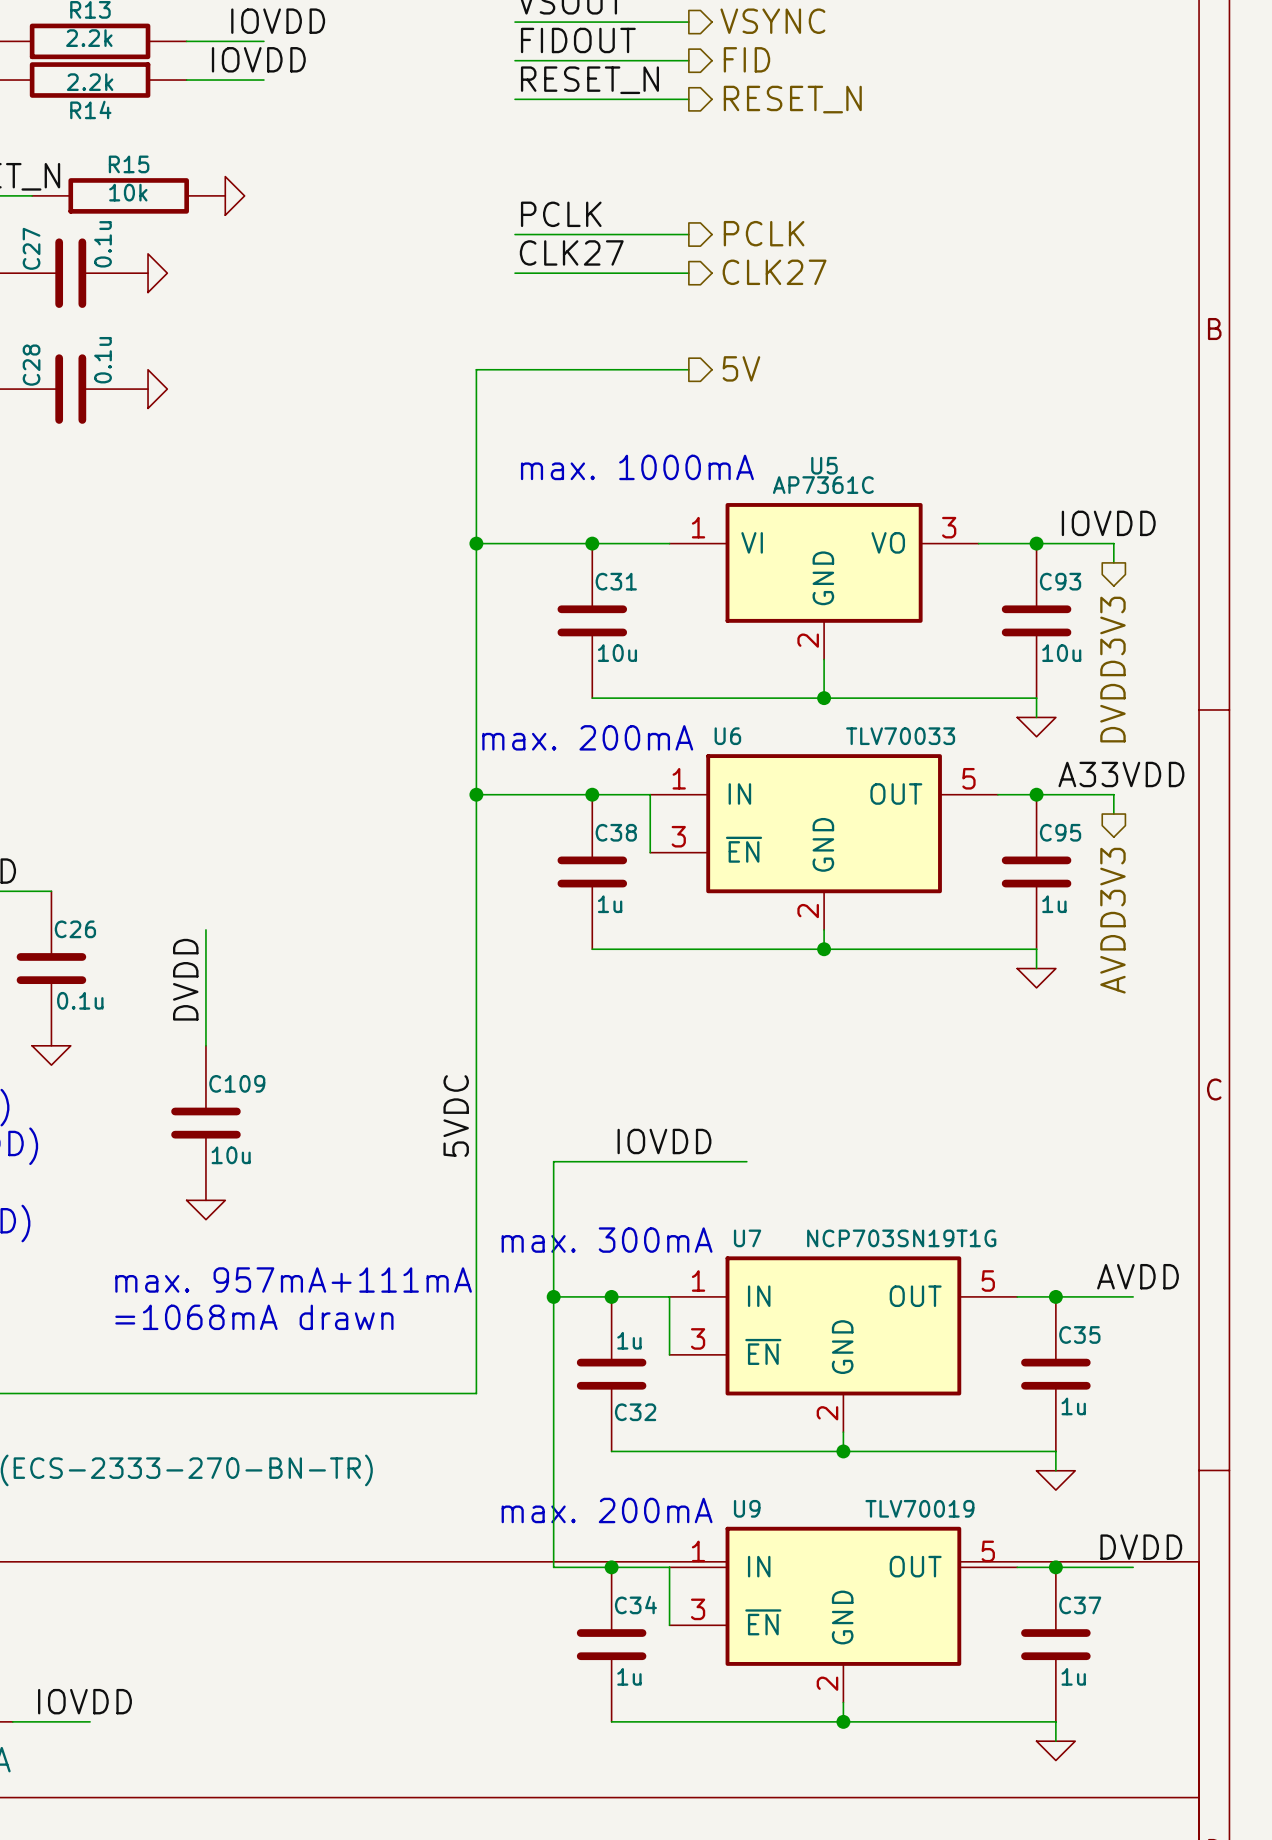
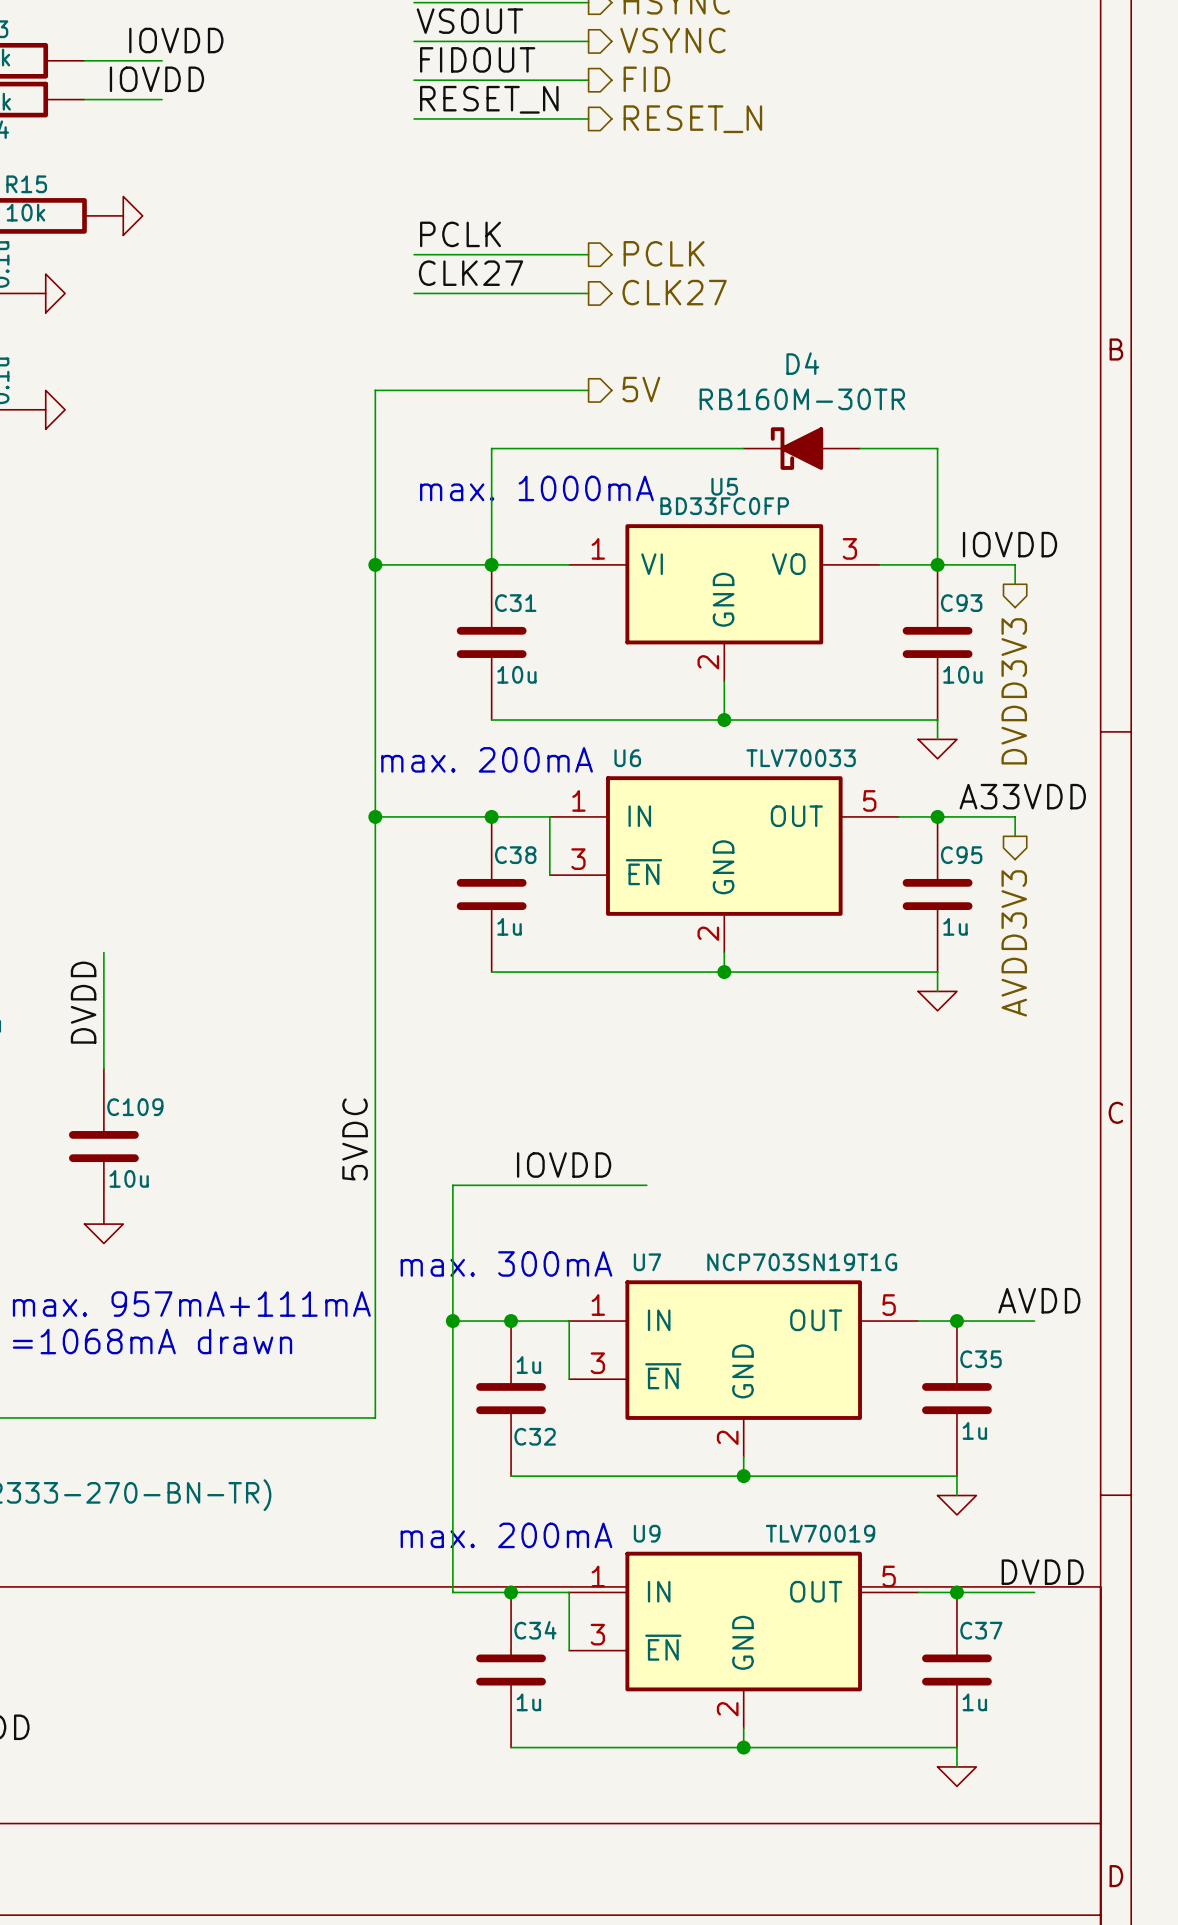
wire: none -> (743, 448) (491, 448) (491, 564)
D4: none -> RB160M-30TR (801, 448)
wire: none -> (860, 448) (937, 448) (937, 564)
U5 value: AP7361C (823, 485) -> BD33FC0FP (724, 506)

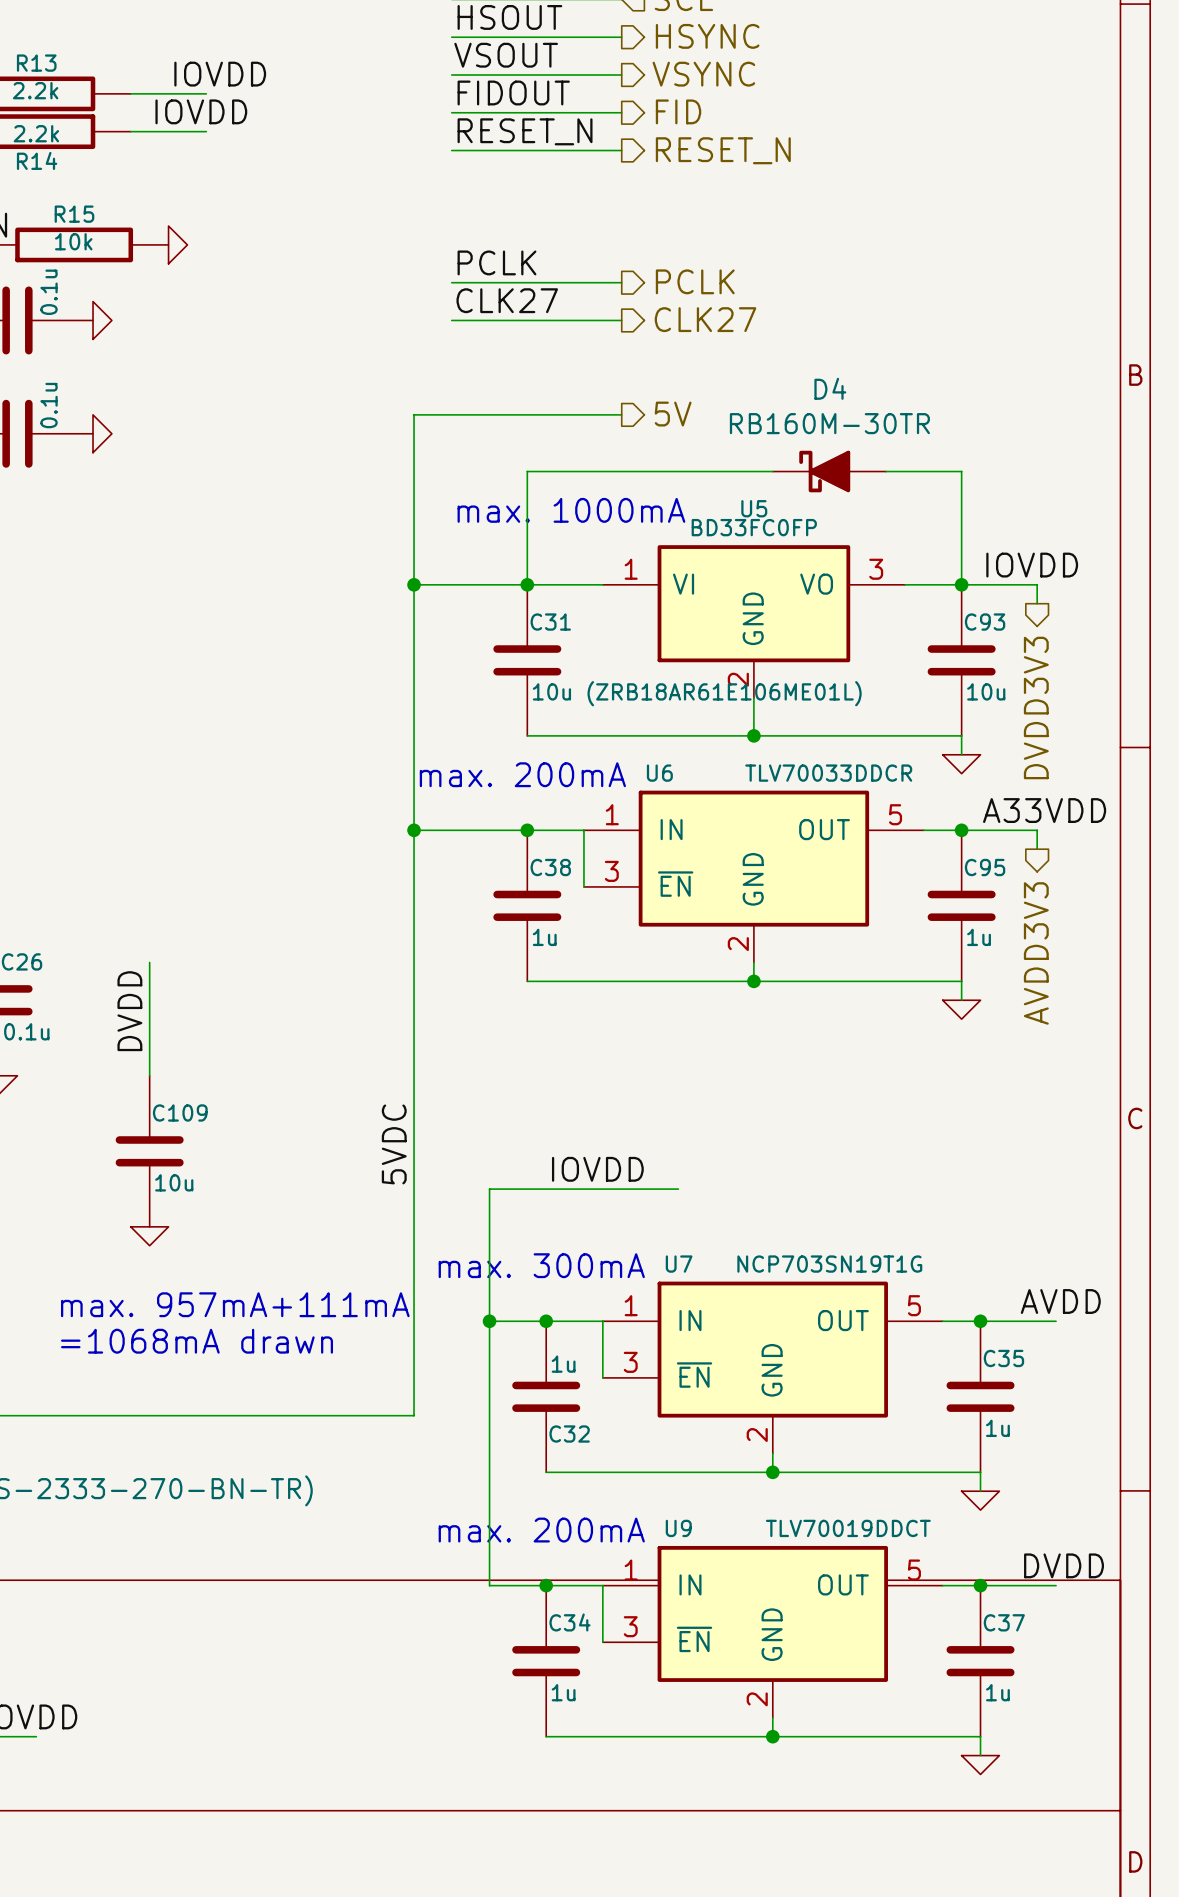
C31 value: 10u (516, 674) -> 10u (ZRB18AR61E106ME01L) (697, 693)
U6 value: TLV70033 (801, 758) -> TLV70033DDCR (828, 773)
U9 value: TLV70019 (820, 1533) -> TLV70019DDCT (848, 1528)

